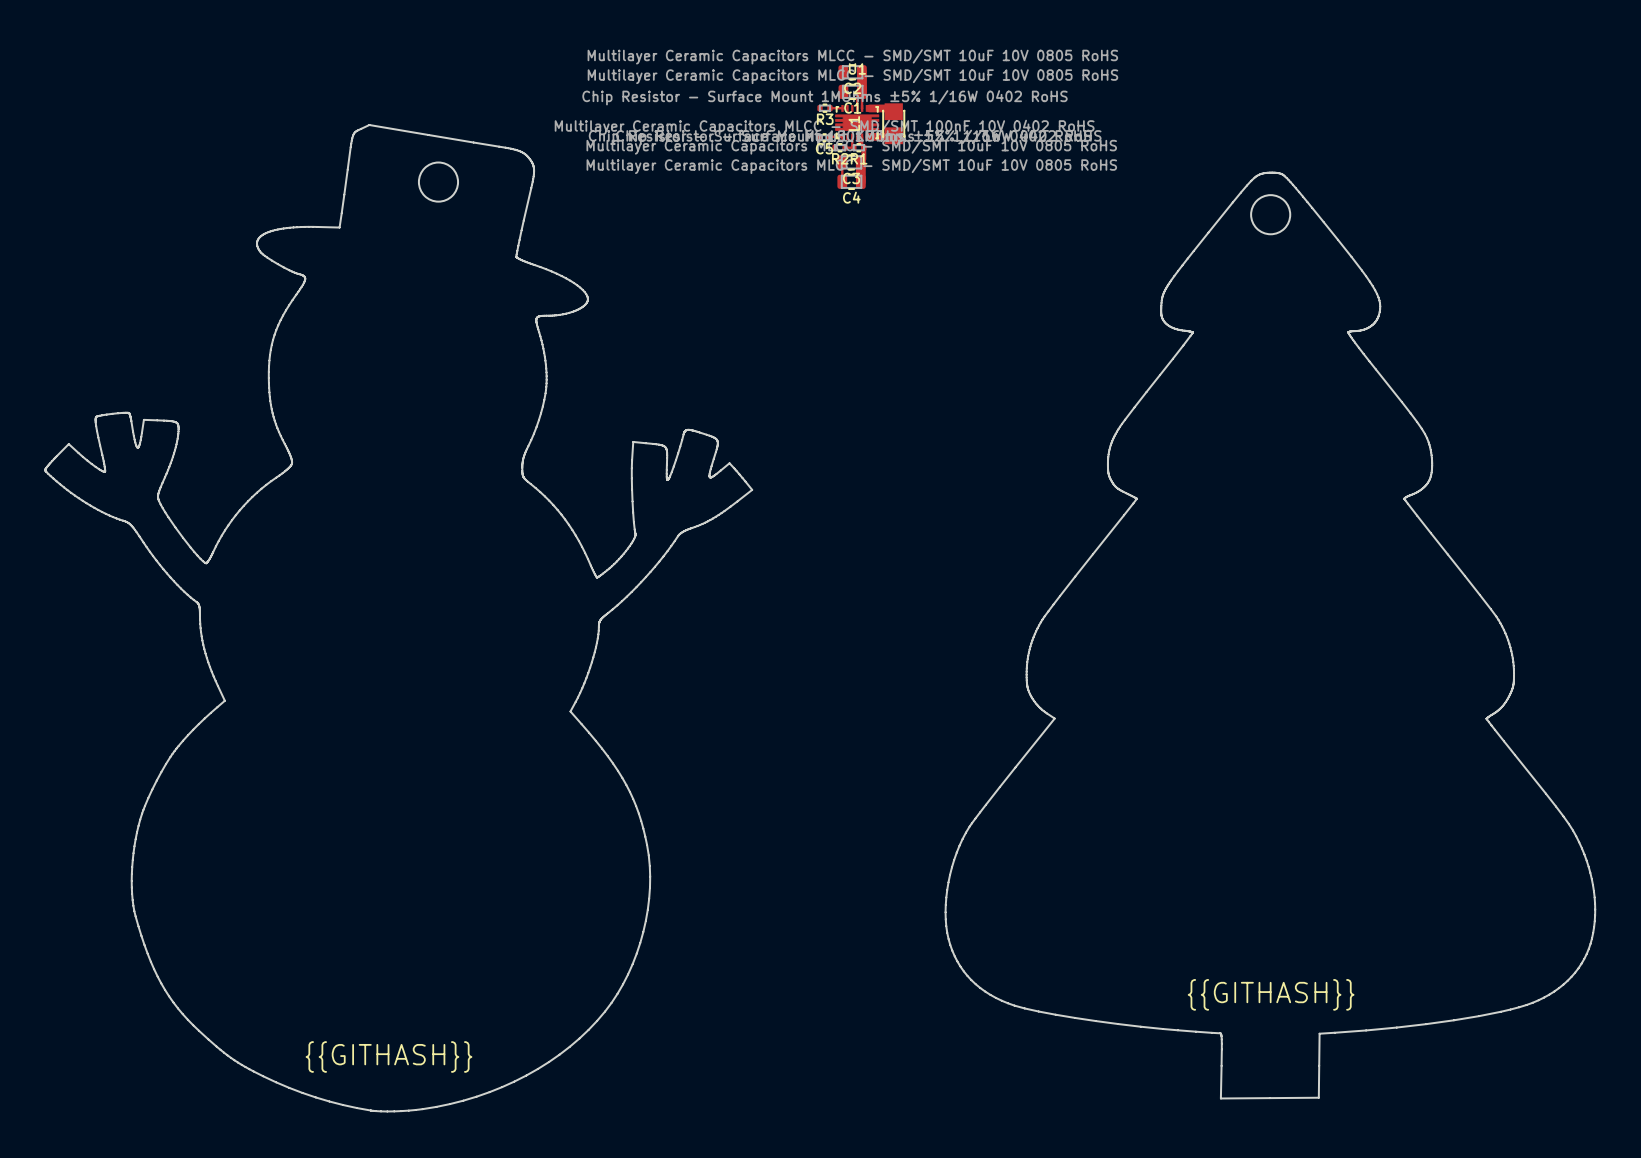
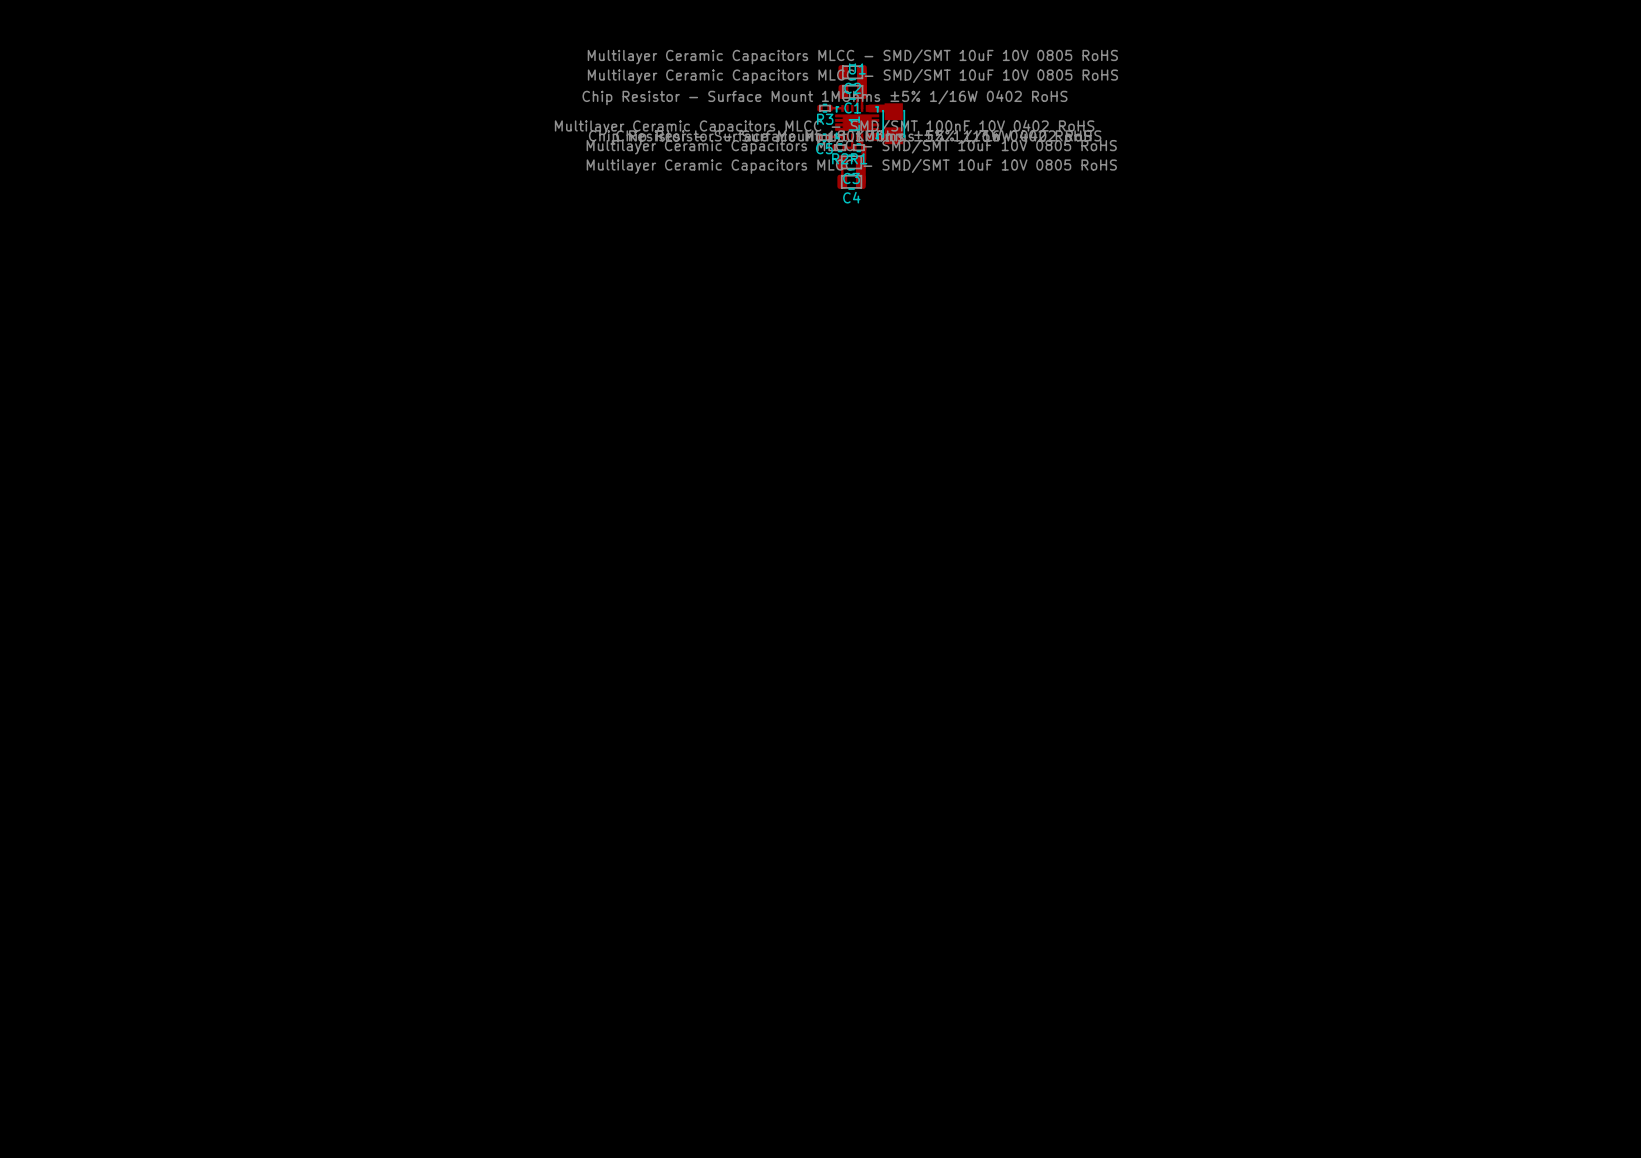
round board edge: [417, 161, 460, 203] -> none
round board edge: [1250, 194, 1292, 236] -> none
board edge: (516, 256) (533, 173) (532, 163) (525, 154) (508, 148) (369, 125) (355, 132) (351, 143) (339, 227) (280, 228) (264, 233) (257, 241) (257, 247) (263, 254) (305, 278) (278, 325) (273, 339) (269, 360) (269, 387) (271, 409) (292, 463) (286, 470) (256, 492) (239, 510) (224, 530) (206, 563) -> none
board edge: (516, 256) (566, 278) (580, 287) (587, 297) (585, 304) (575, 310) (559, 314) (539, 316) (536, 318) (545, 360) (546, 386) (538, 420) (523, 457) (522, 470) (524, 478) (549, 500) (568, 524) (597, 577) -> none
board edge: (1192, 332) (1172, 327) (1163, 320) (1161, 307) (1164, 290) (1182, 265) (1246, 185) (1257, 175) (1271, 172) (1282, 174) (1292, 184) (1351, 256) (1377, 294) (1380, 309) (1375, 321) (1365, 328) (1348, 332) -> none
board edge: (1192, 332) (1121, 423) (1110, 445) (1107, 464) (1110, 478) (1117, 488) (1136, 498) -> none
board edge: (1348, 332) (1417, 421) (1428, 442) (1432, 460) (1430, 478) (1422, 488) (1404, 498) -> none
board edge: (129, 413) (96, 417) (105, 471) -> none
board edge: (129, 413) (137, 447) (143, 419) (171, 421) (177, 424) (175, 447) (158, 498) (183, 537) (206, 563) -> none
board edge: (45, 469) (68, 444) (91, 463) (104, 471) -> none
board edge: (45, 470) (82, 500) (105, 513) (129, 523) (166, 573) (197, 603) (205, 653) (224, 700) (193, 729) (170, 757) (148, 797) (136, 832) (131, 874) (133, 905) (144, 945) (161, 983) (173, 1002) (193, 1025) (224, 1052) (245, 1067) (276, 1082) (315, 1097) (356, 1108) (387, 1111) (422, 1109) (463, 1100) (502, 1087) (537, 1069) (569, 1046) (597, 1020) (617, 993) (632, 964) (643, 931) (649, 898) (649, 865) (643, 828) (633, 798) (617, 770) (570, 711) (590, 667) (600, 619) (645, 577) (679, 534) (715, 516) (752, 489) (729, 463) (709, 477) (717, 441) (711, 436) (690, 429) (684, 432) (667, 479) -> none
board edge: (667, 479) (667, 452) (665, 447) (633, 441) (632, 489) (635, 535) (619, 559) (597, 577) -> none
board edge: (1136, 498) (1053, 604) (1037, 628) (1028, 655) (1027, 686) (1036, 703) (1054, 718) (969, 826) (959, 845) (951, 867) (945, 912) (950, 944) (963, 971) (975, 984) (990, 994) (1014, 1005) (1055, 1014) (1140, 1026) (1220, 1033) (1220, 1098) (1318, 1097) (1319, 1033) (1396, 1027) (1453, 1020) (1510, 1009) (1544, 997) (1571, 976) (1581, 963) (1588, 949) (1595, 915) (1591, 879) (1581, 848) (1569, 824) (1486, 718) -> none
board edge: (1404, 498) (1490, 609) (1506, 636) (1513, 662) (1512, 686) (1502, 705) (1486, 718) -> none
text: {{GITHASH}} (1271, 994) -> none
text: {{GITHASH}} (388, 1056) -> none

